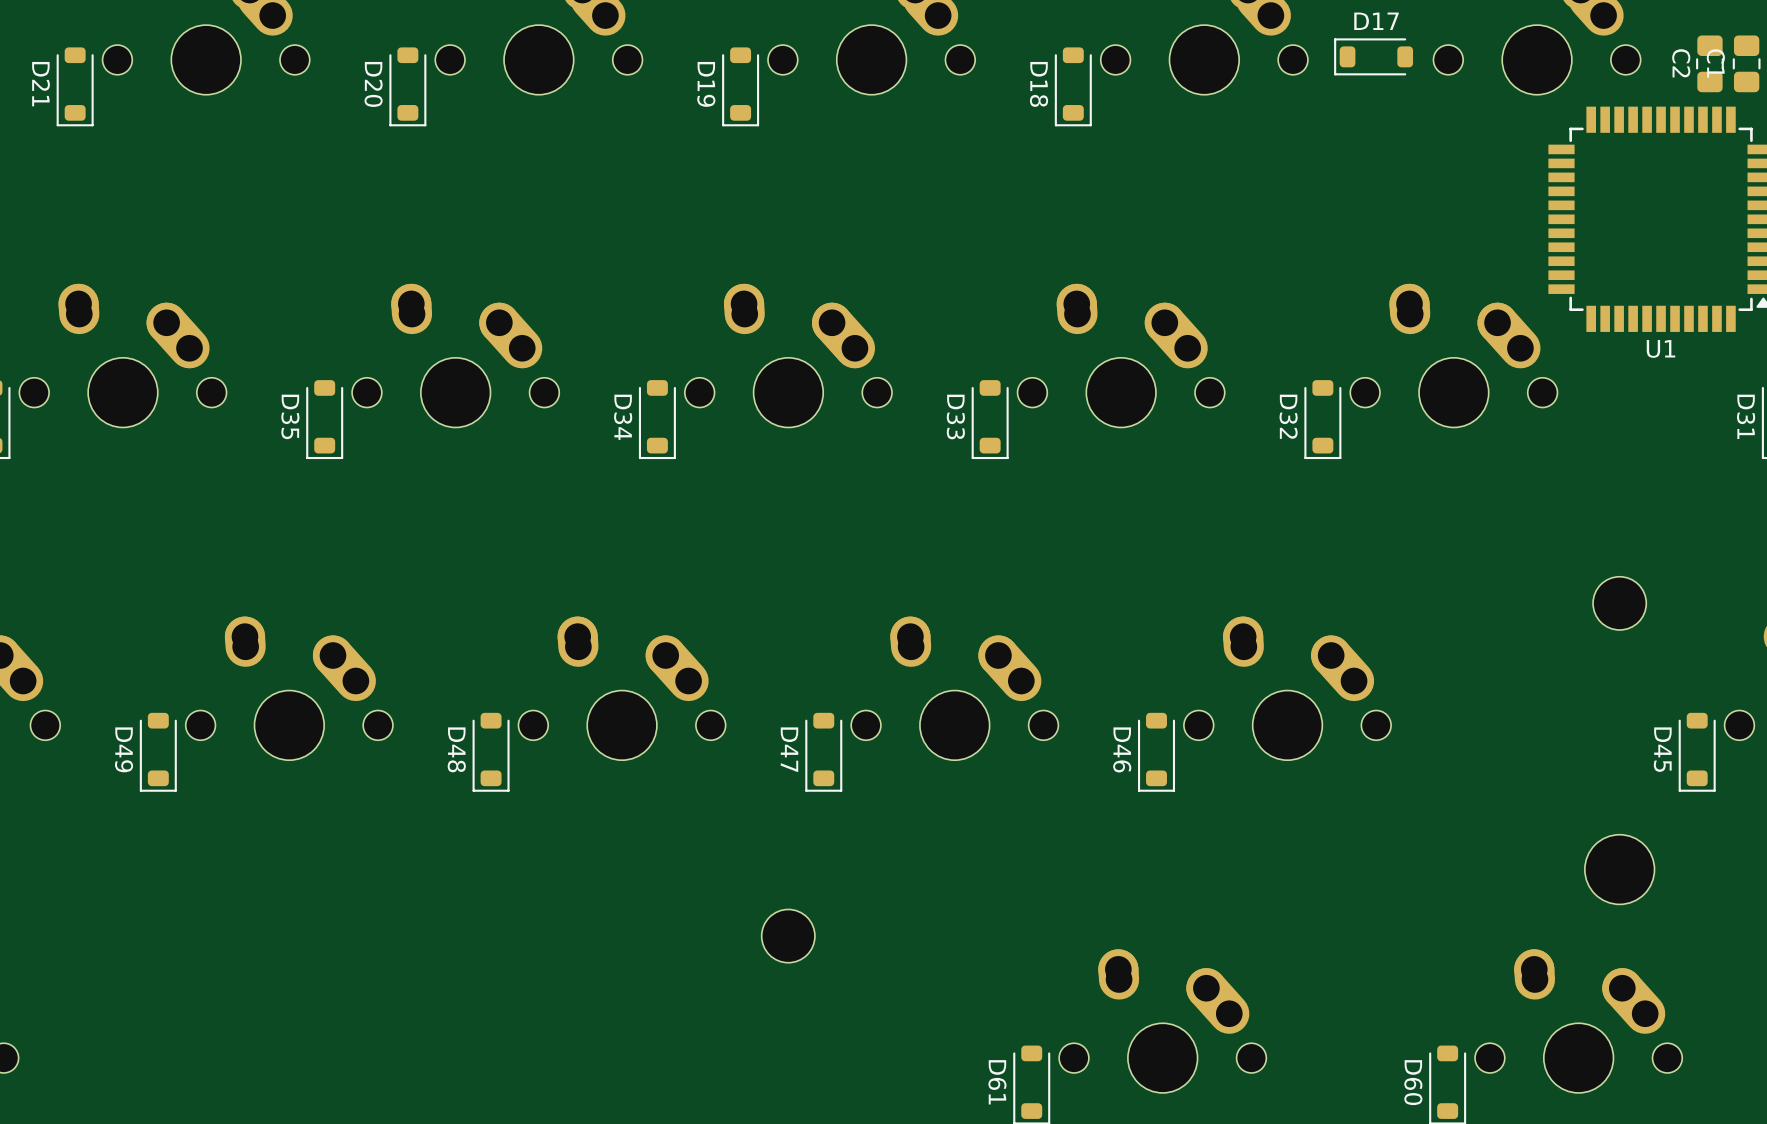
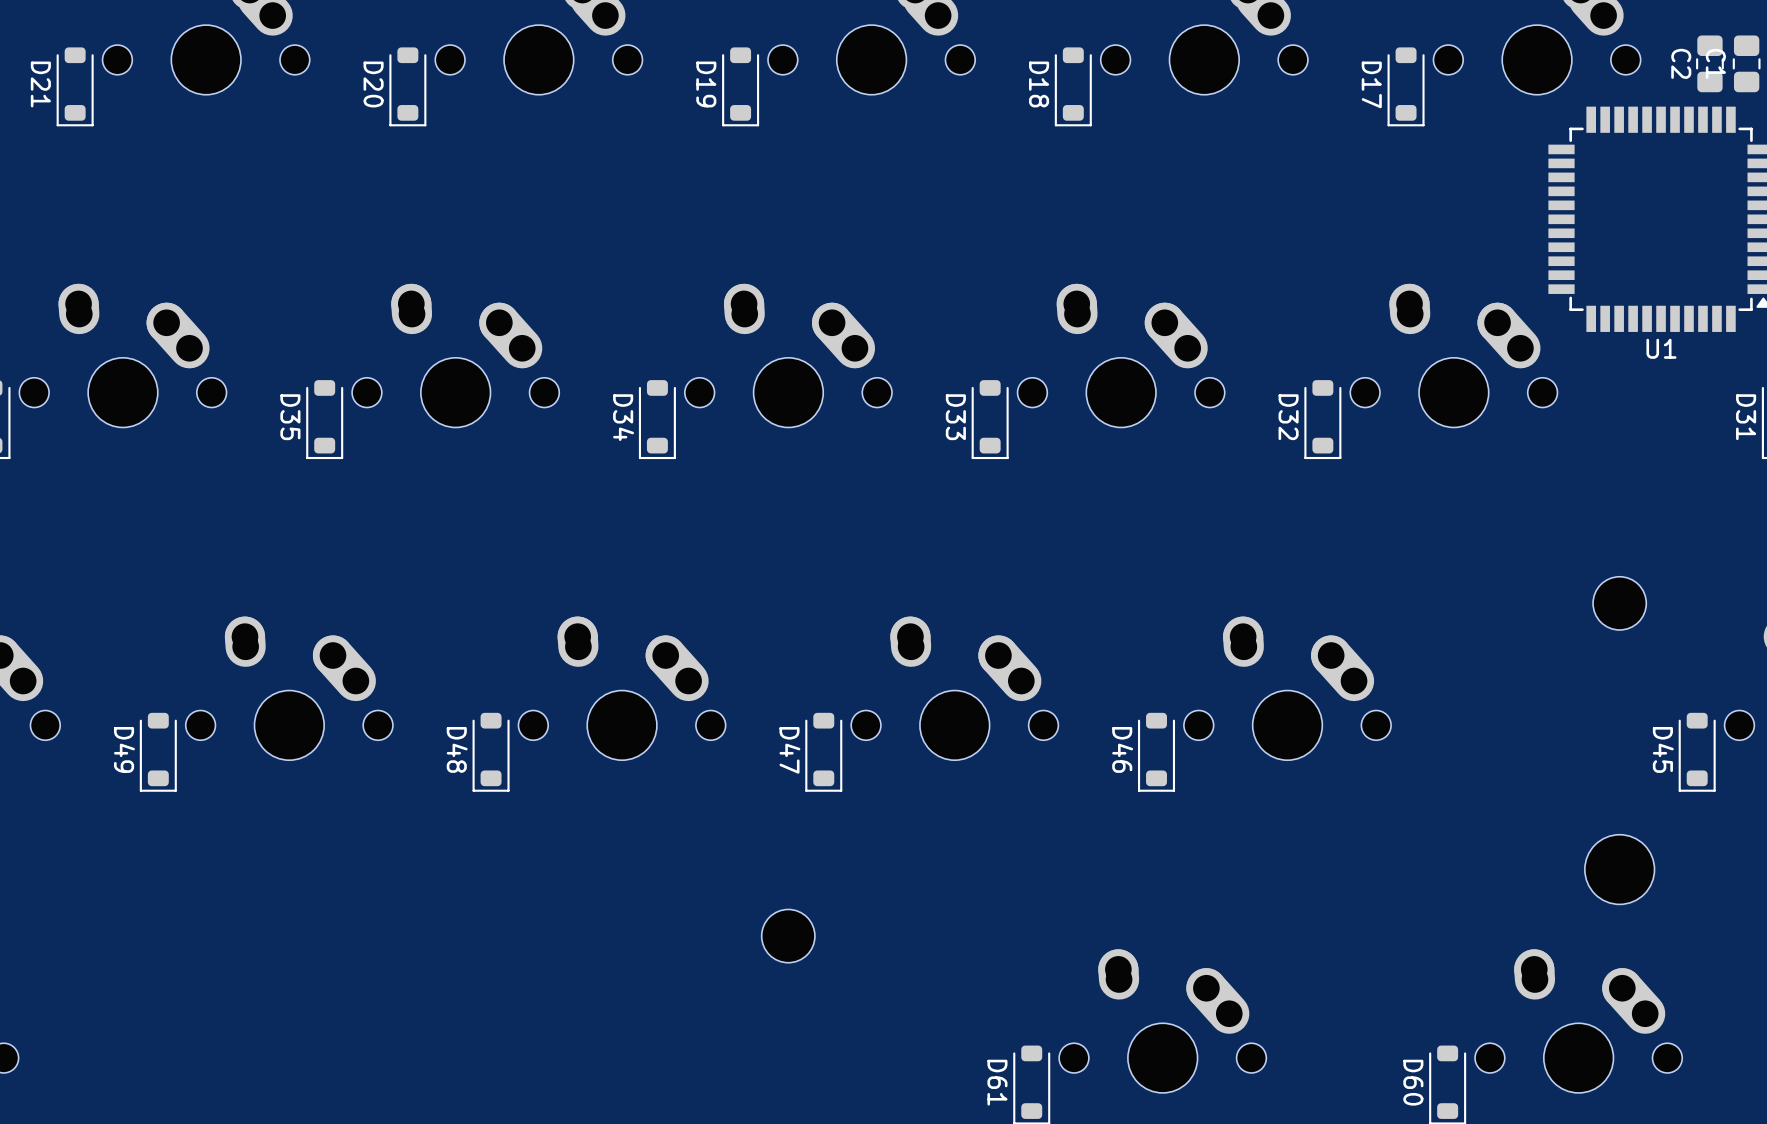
D17 rotation: 0° (1373, 56) -> 90° counterclockwise (1406, 86)

